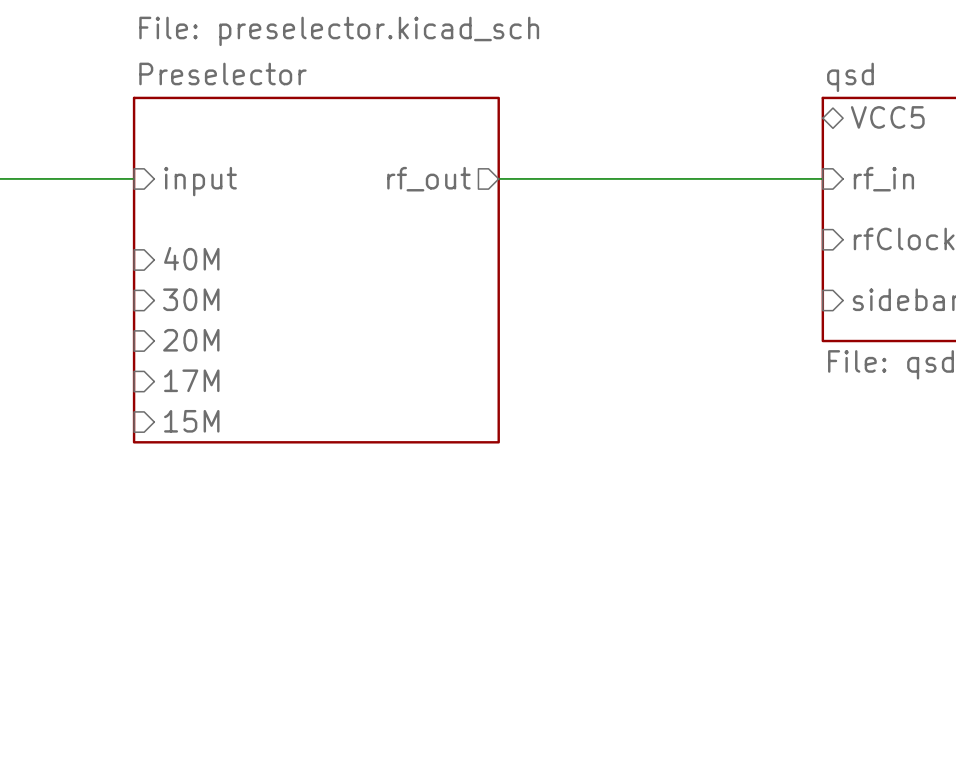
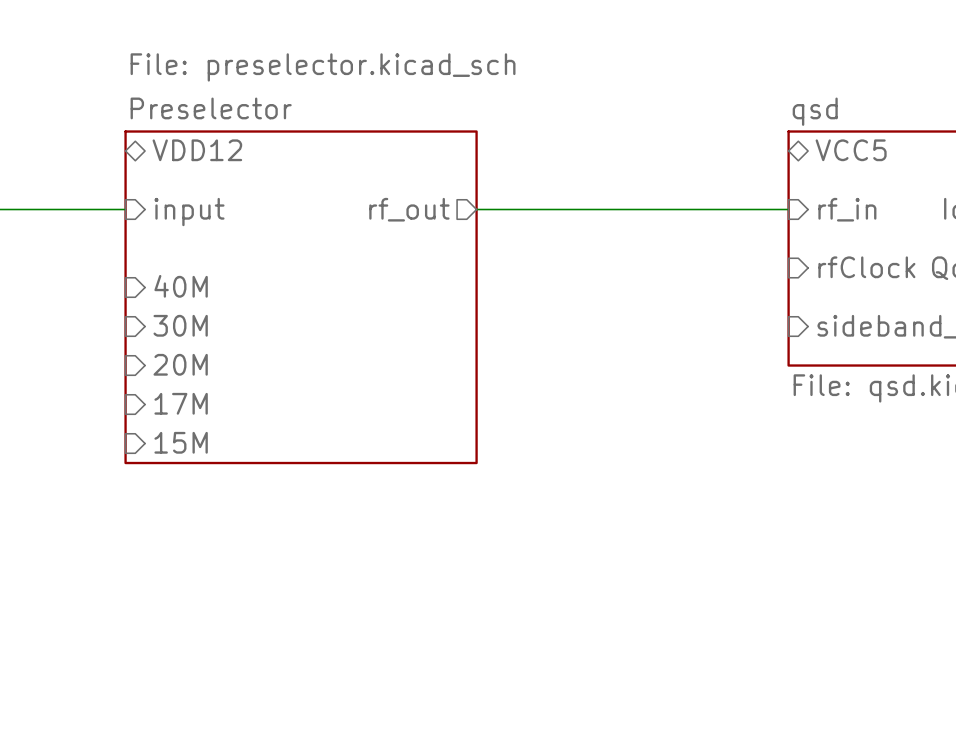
sheet pin: none -> VDD12 (197, 150)

